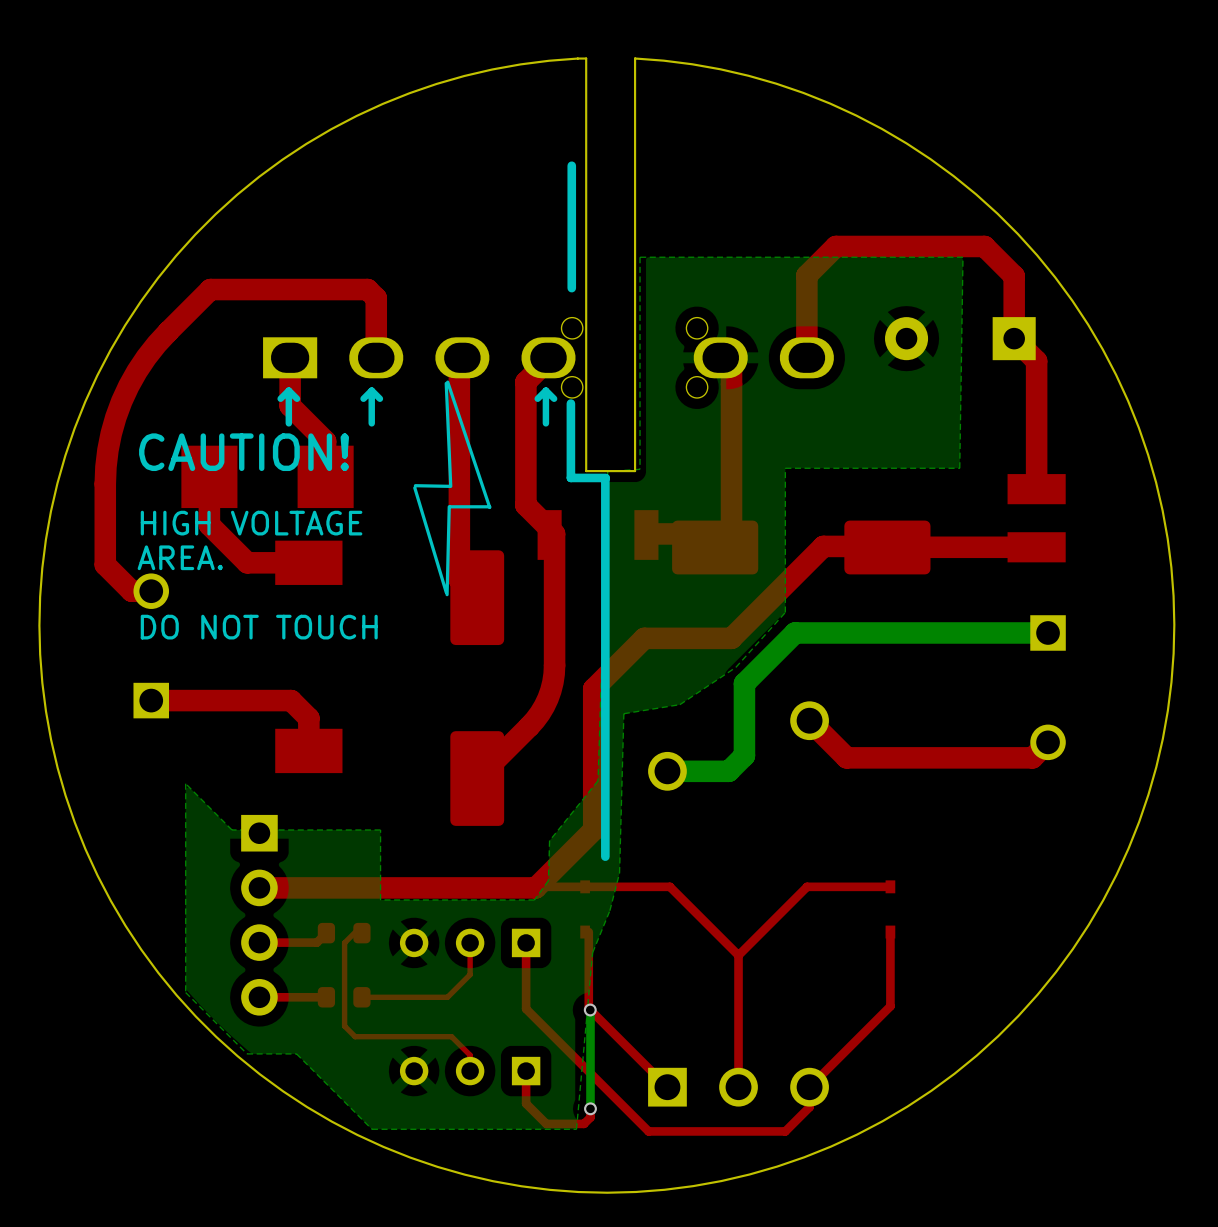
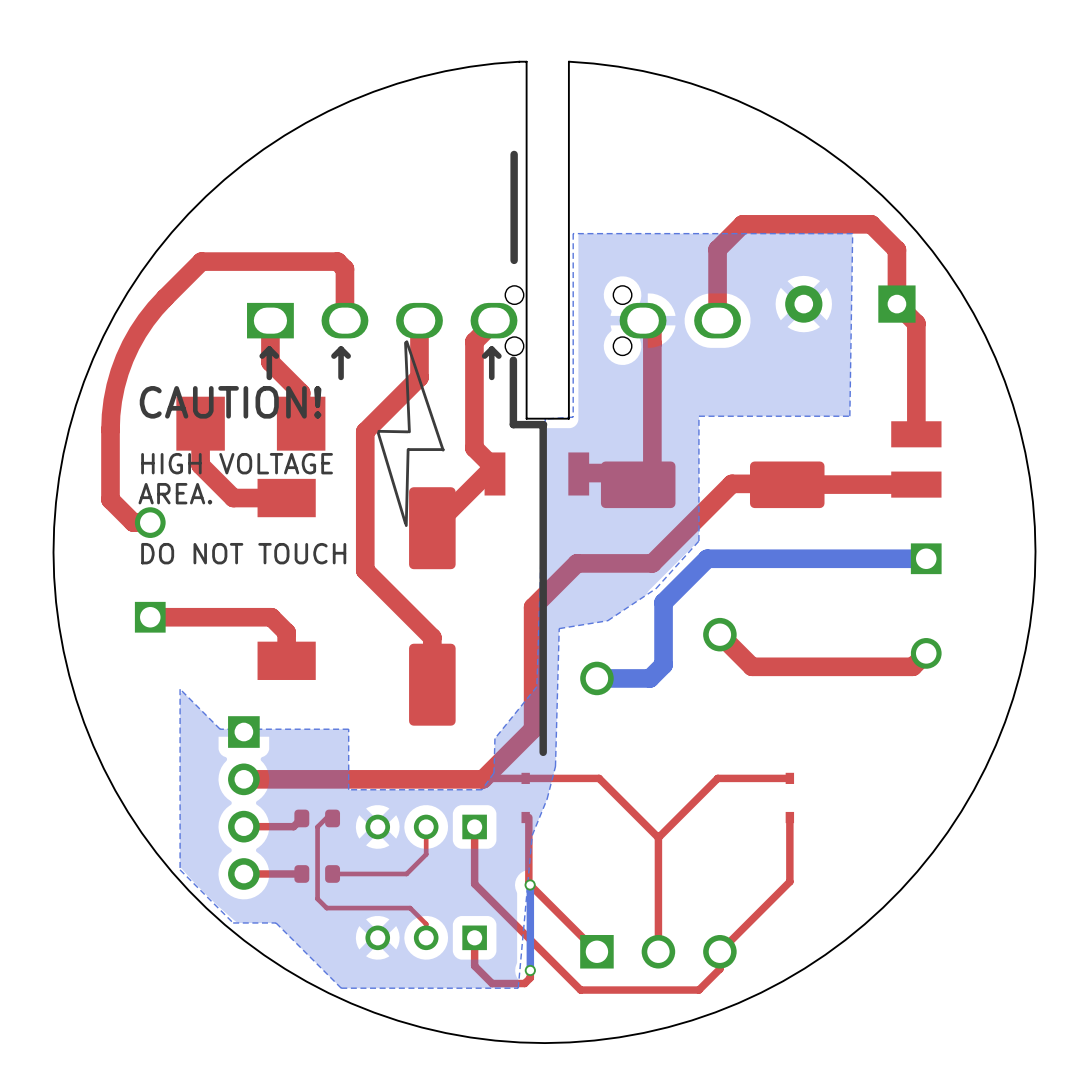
top track: (459, 362) (459, 579) (477, 597) -> (486, 473) (432, 528)
top track: (549, 528) (554, 533) (554, 665) (550, 690) (544, 706) (535, 720) (477, 778) -> (419, 320) (419, 377) (365, 431) (365, 570) (432, 637) (432, 684)

